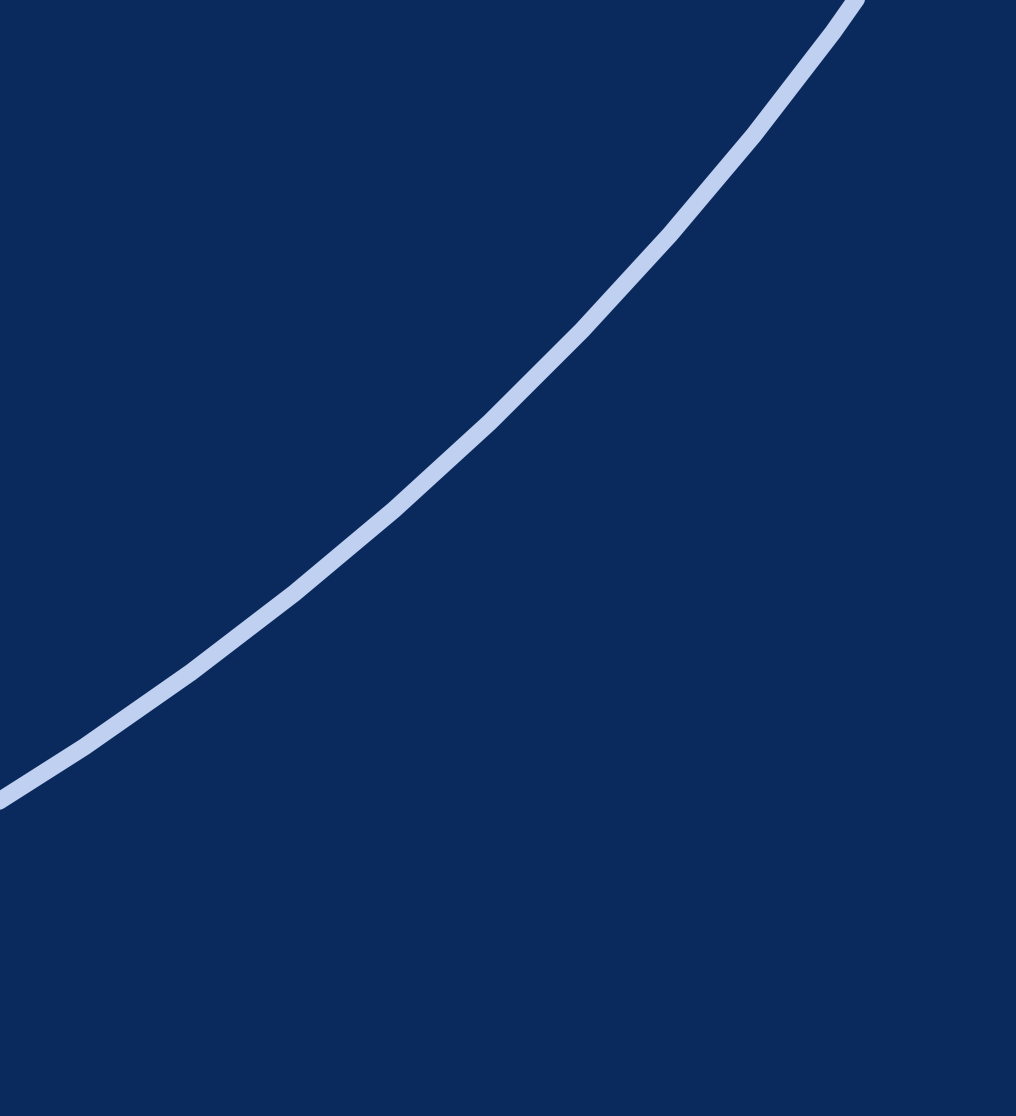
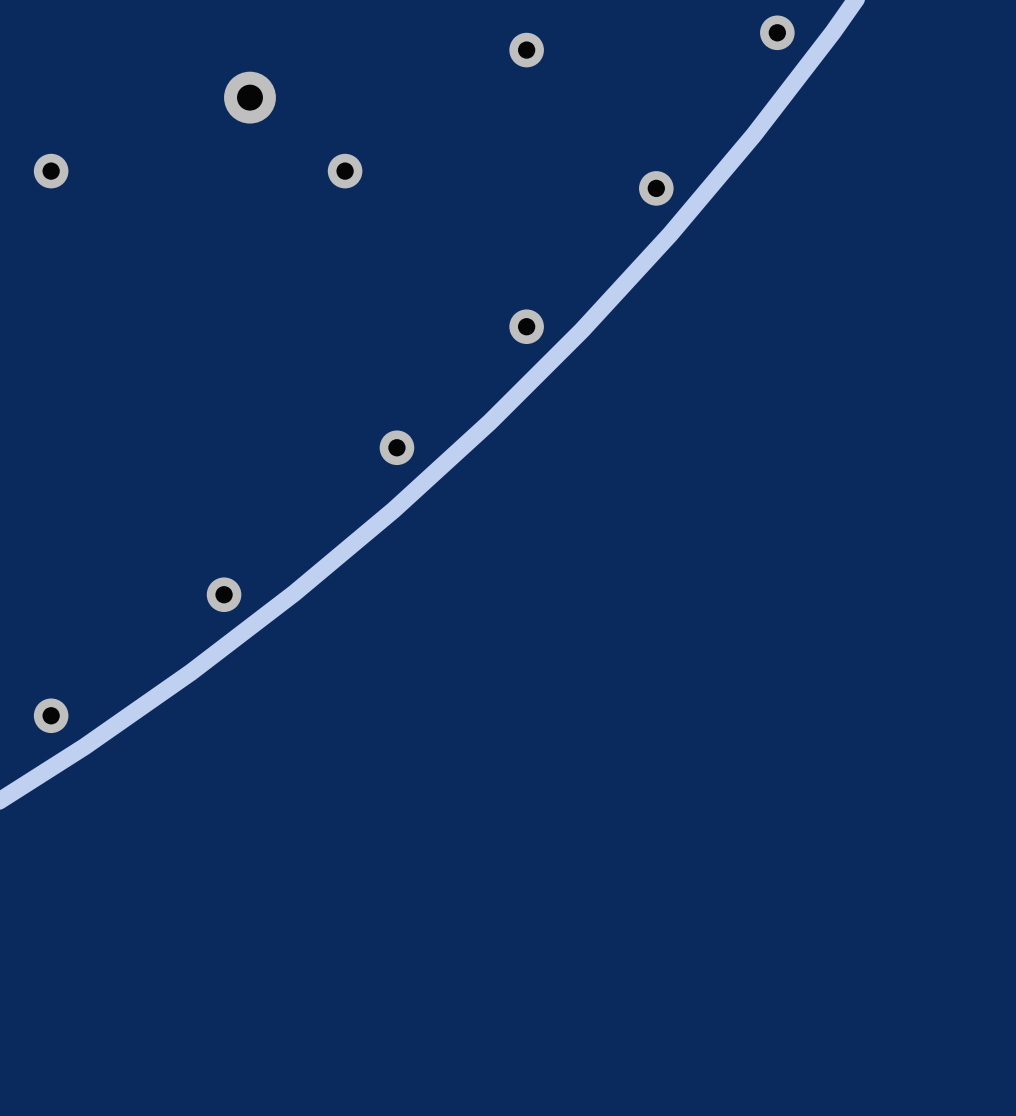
via: none -> (777, 32)
via: none -> (526, 50)
via: none -> (249, 97)
via: none -> (51, 171)
via: none -> (345, 171)
via: none -> (656, 188)
via: none -> (526, 326)
via: none -> (396, 447)
via: none -> (224, 594)
via: none -> (51, 715)

